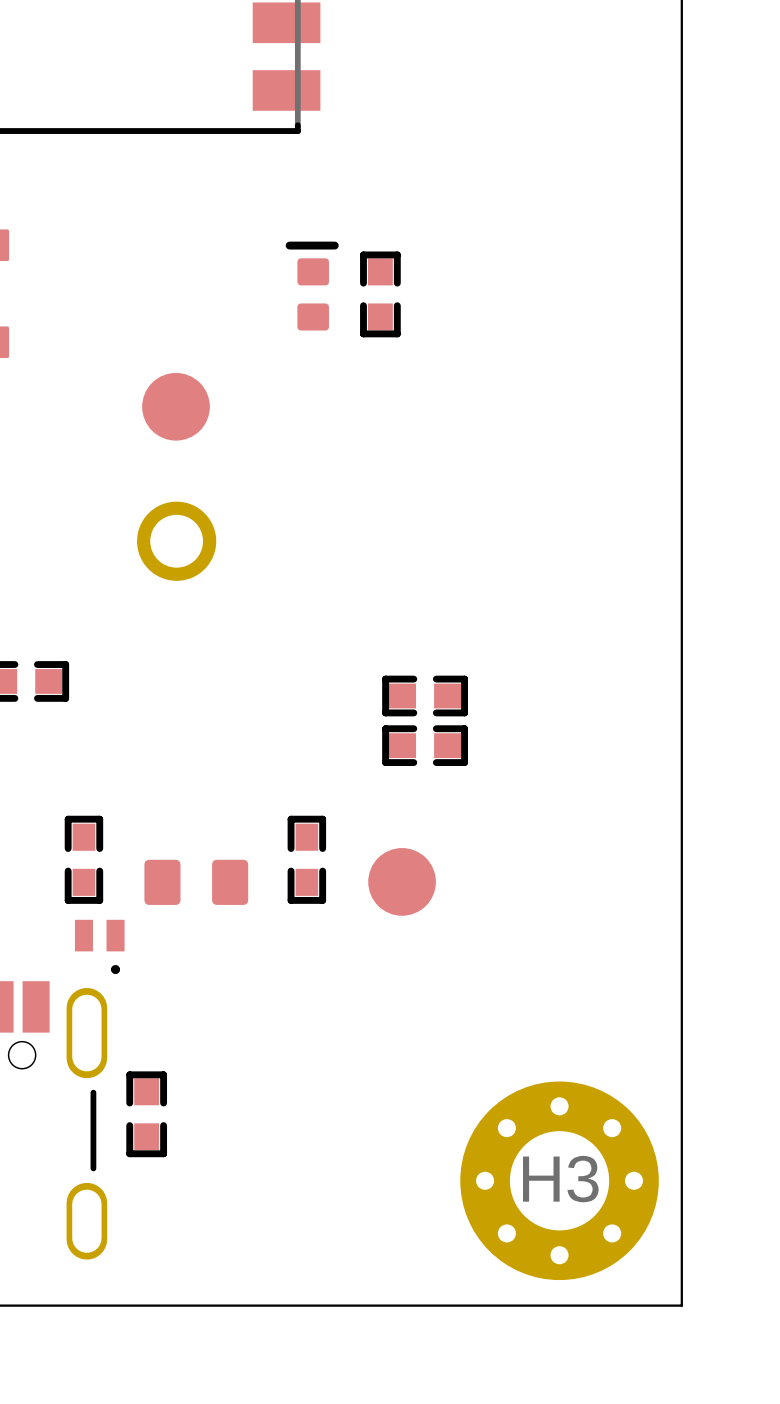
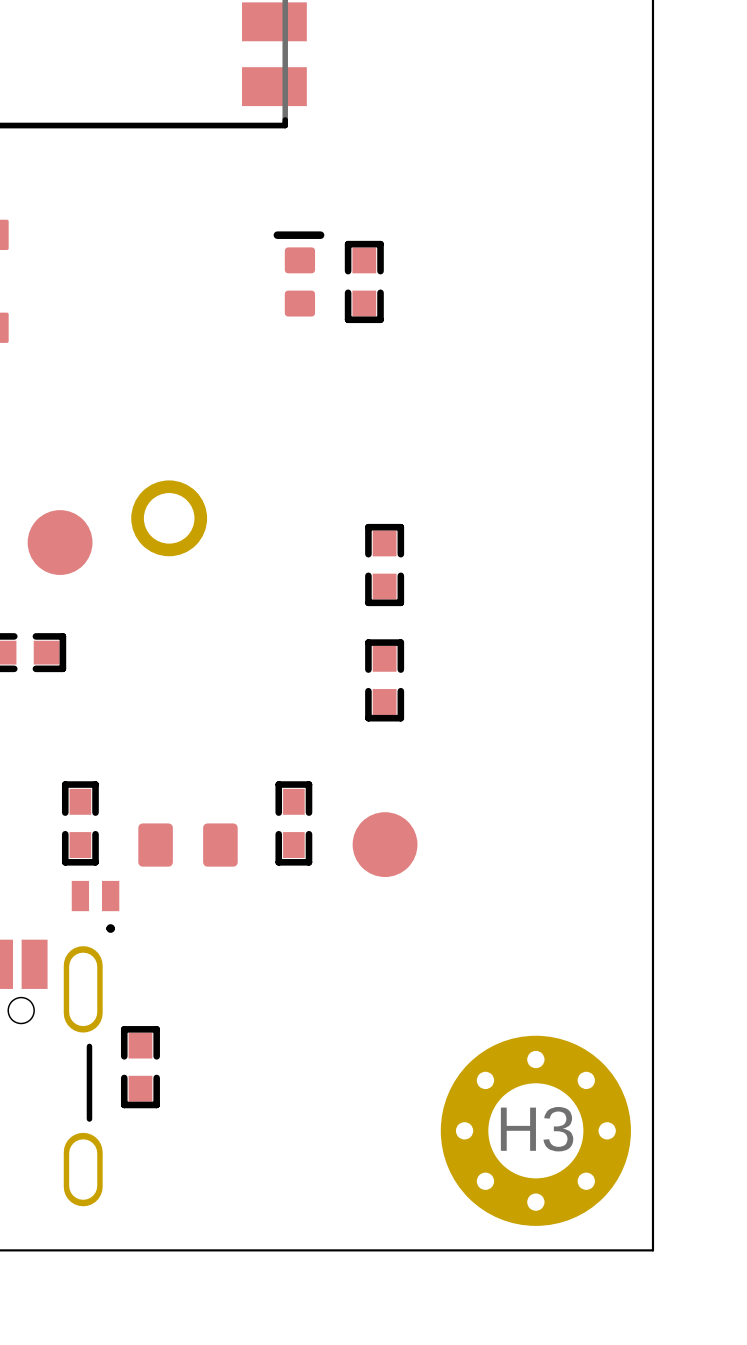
part position: (176, 406) -> (60, 542)
part: none -> (384, 565)
part: (425, 696) -> none
part: none -> (384, 680)
part: (425, 745) -> none

